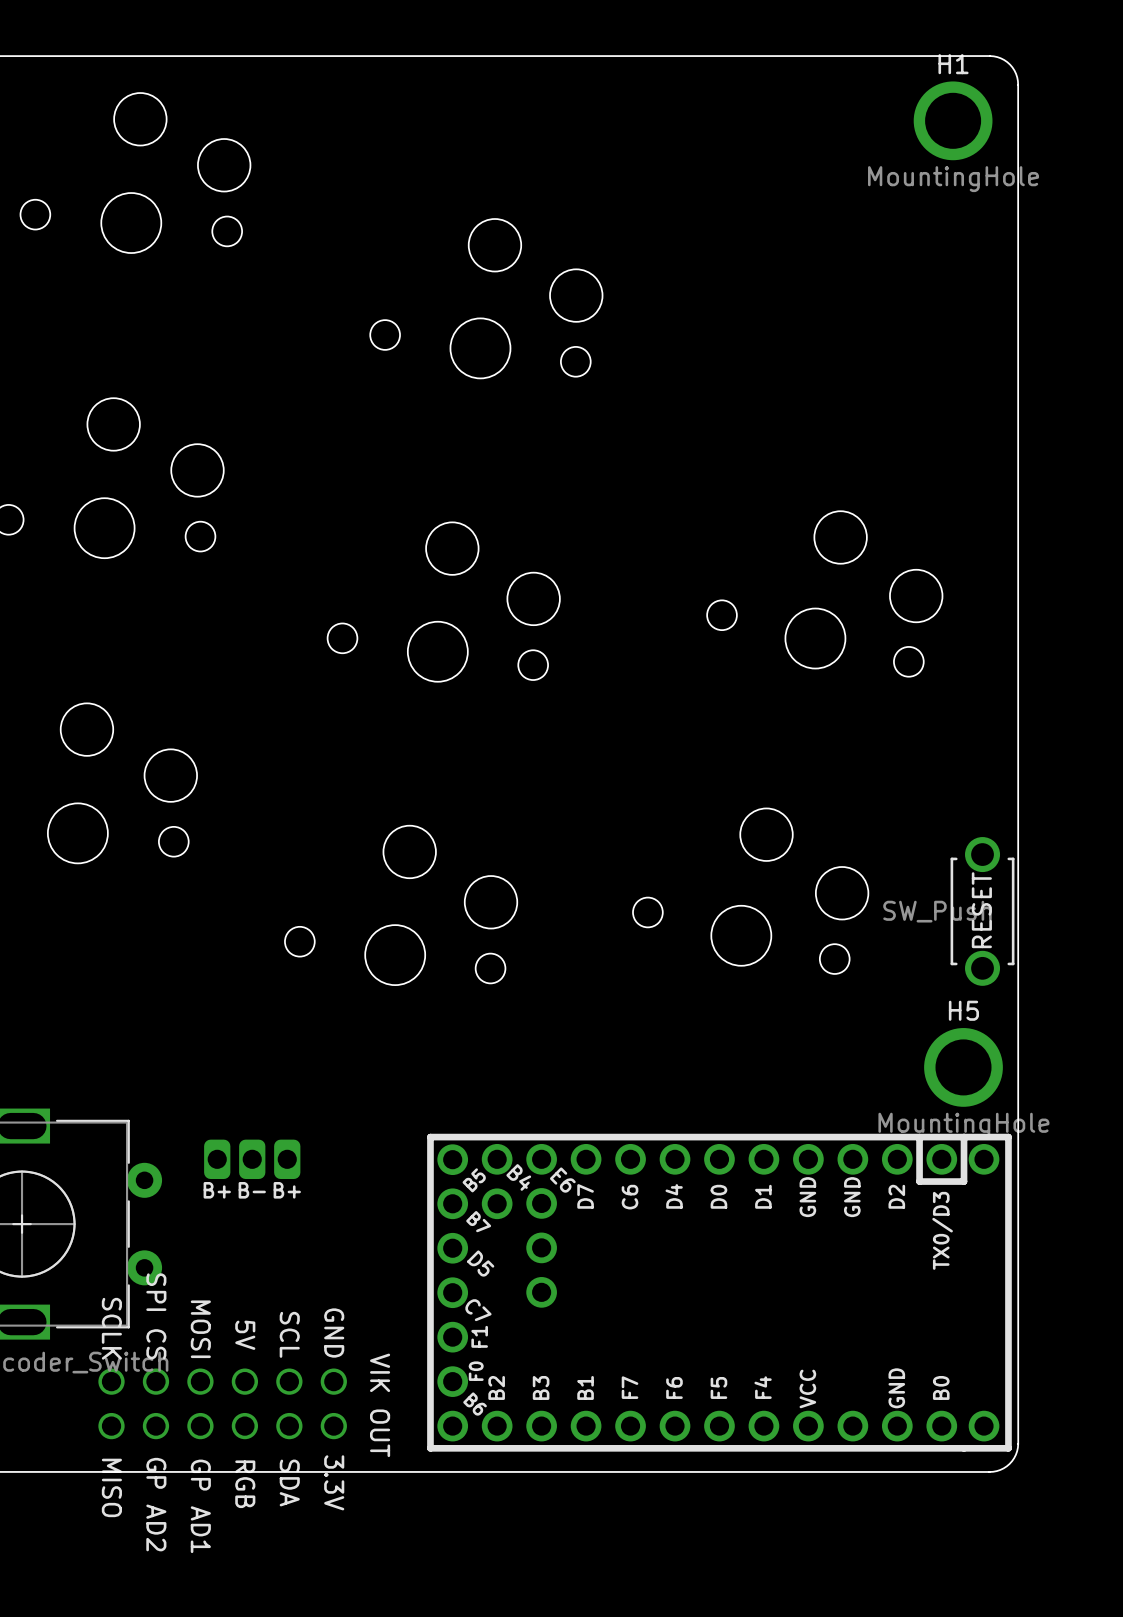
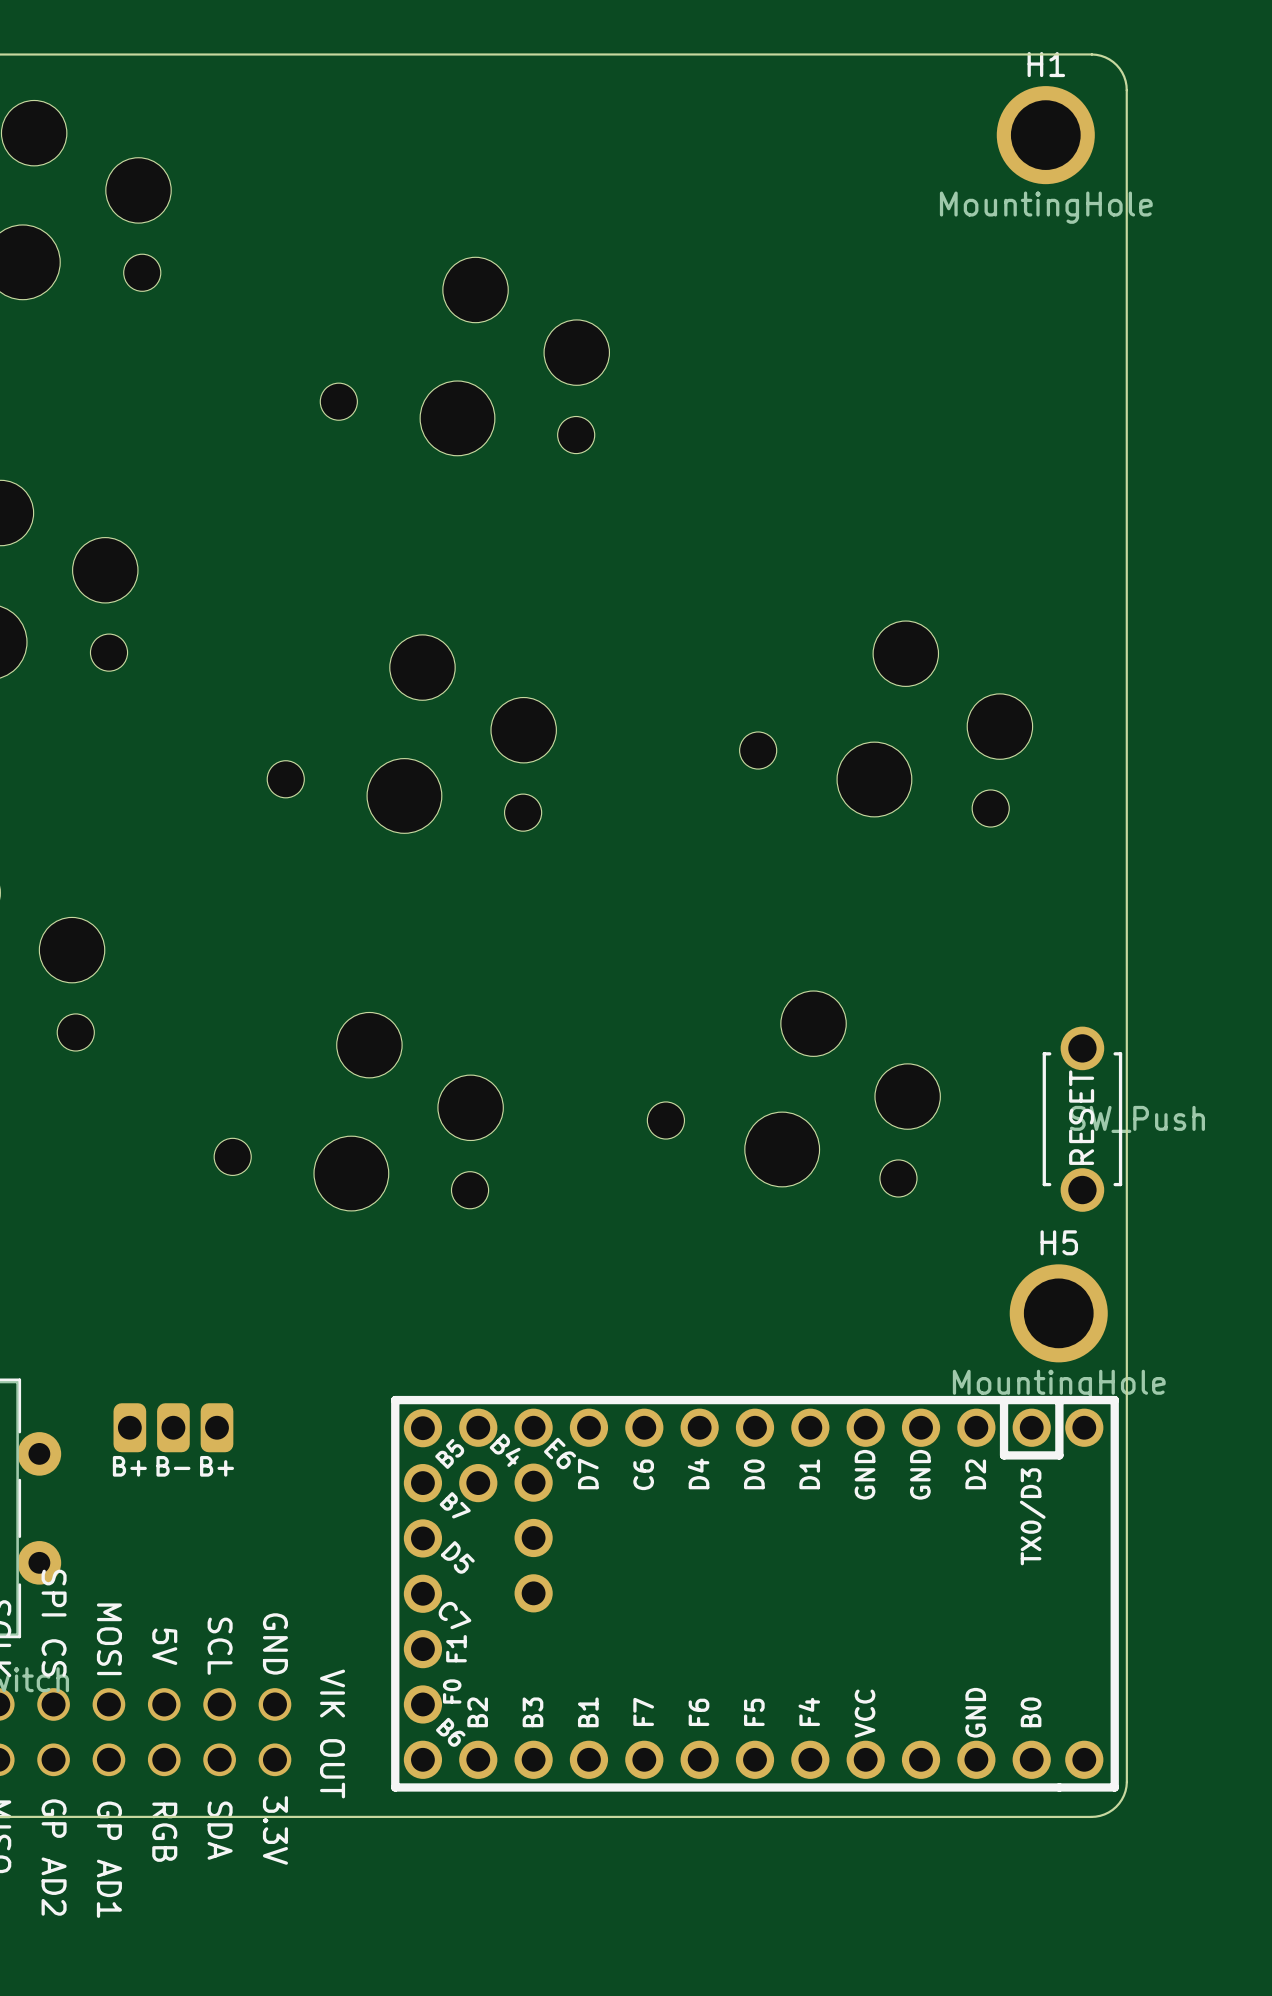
part value position: SW_Push (937, 911) -> SW_Push (1137, 1119)

